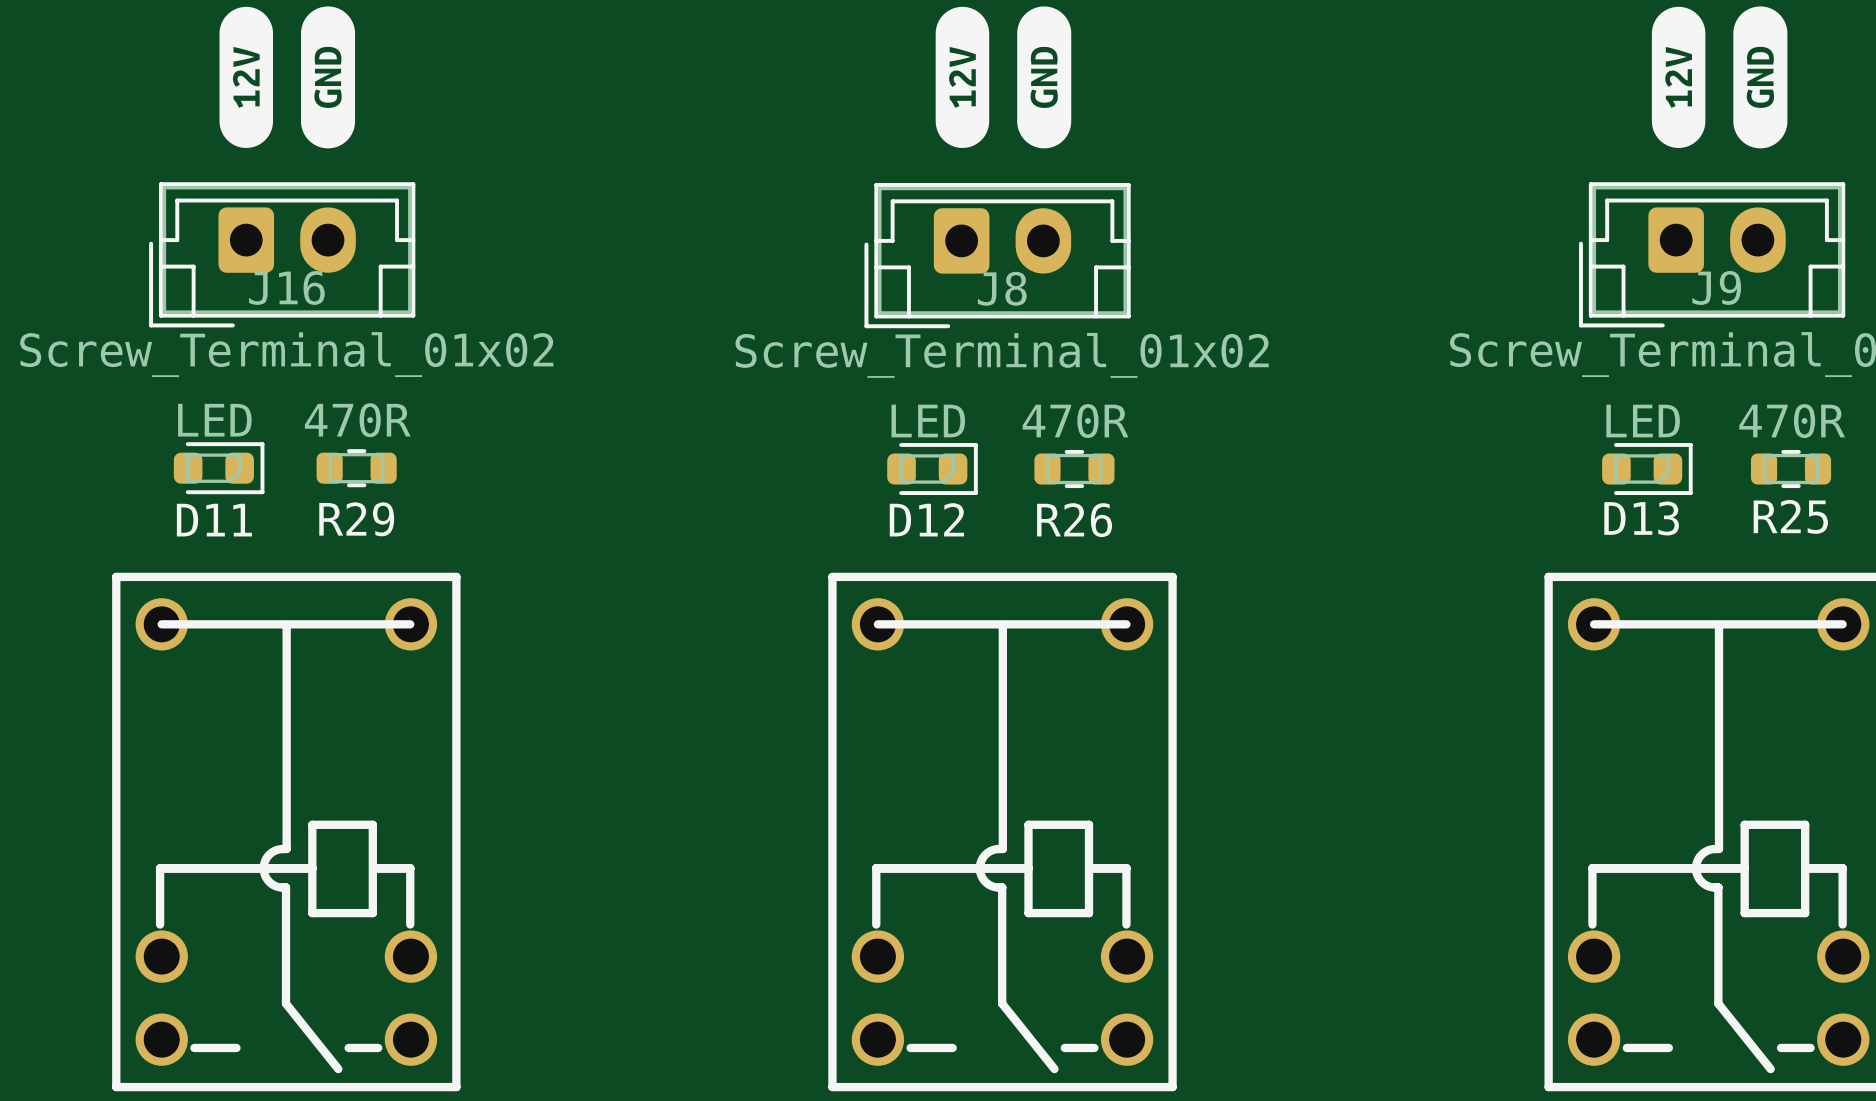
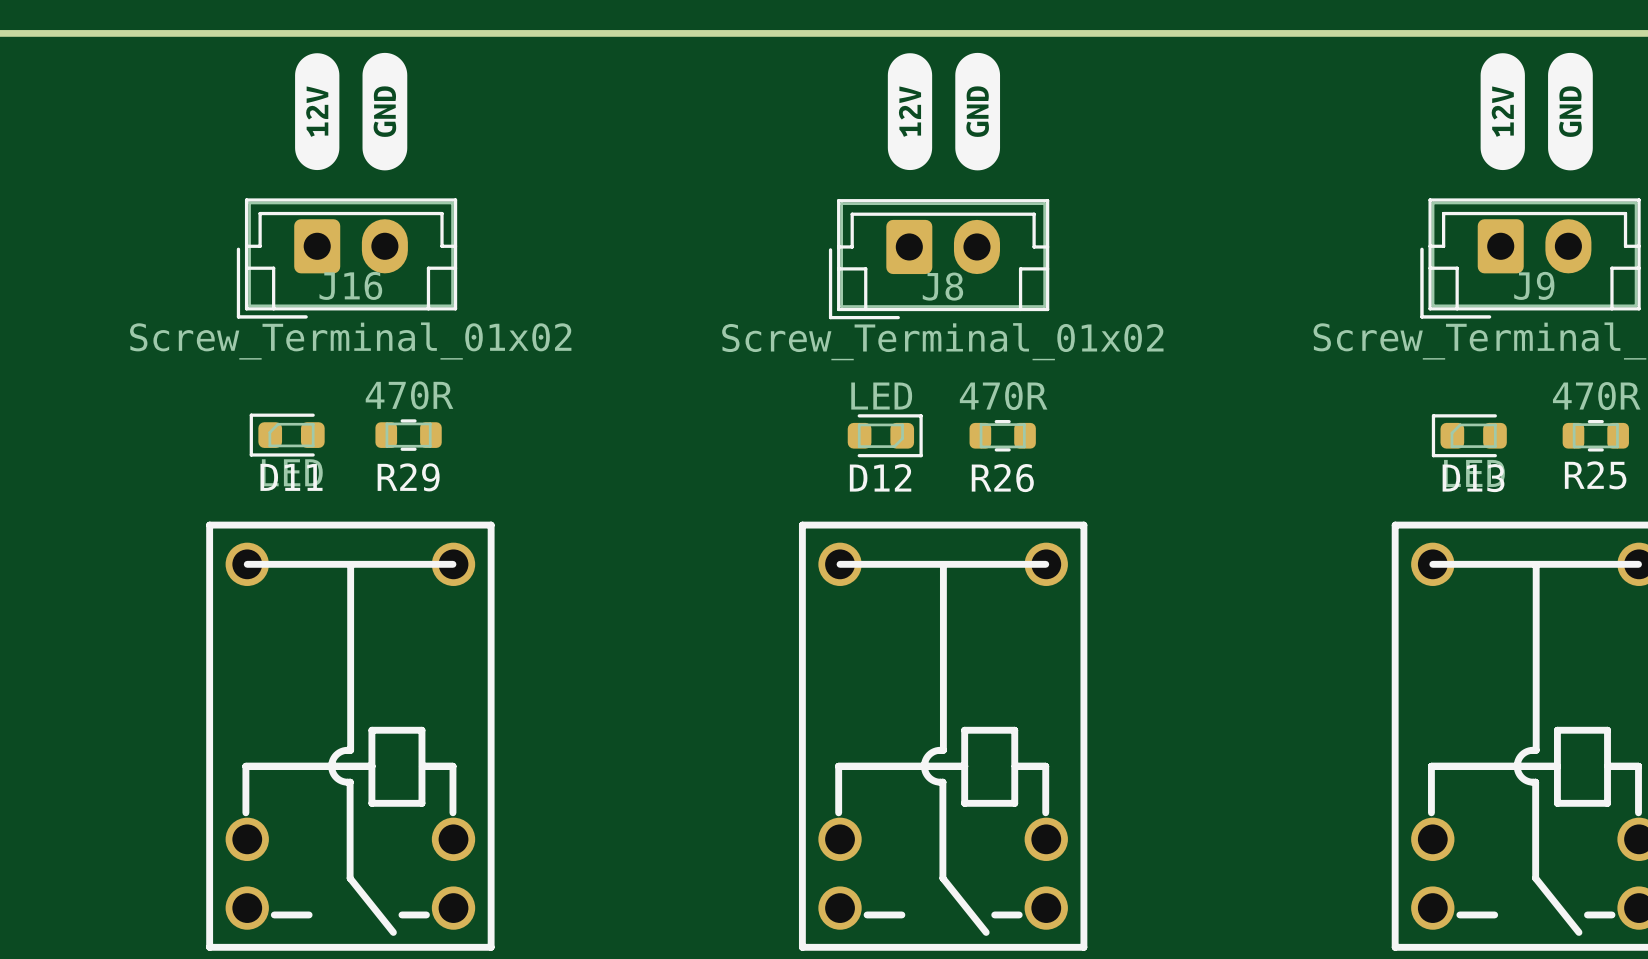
D11 rotation: 0° (219, 468) -> 180° (287, 435)
D13 rotation: 0° (1647, 469) -> 180° (1469, 435)

